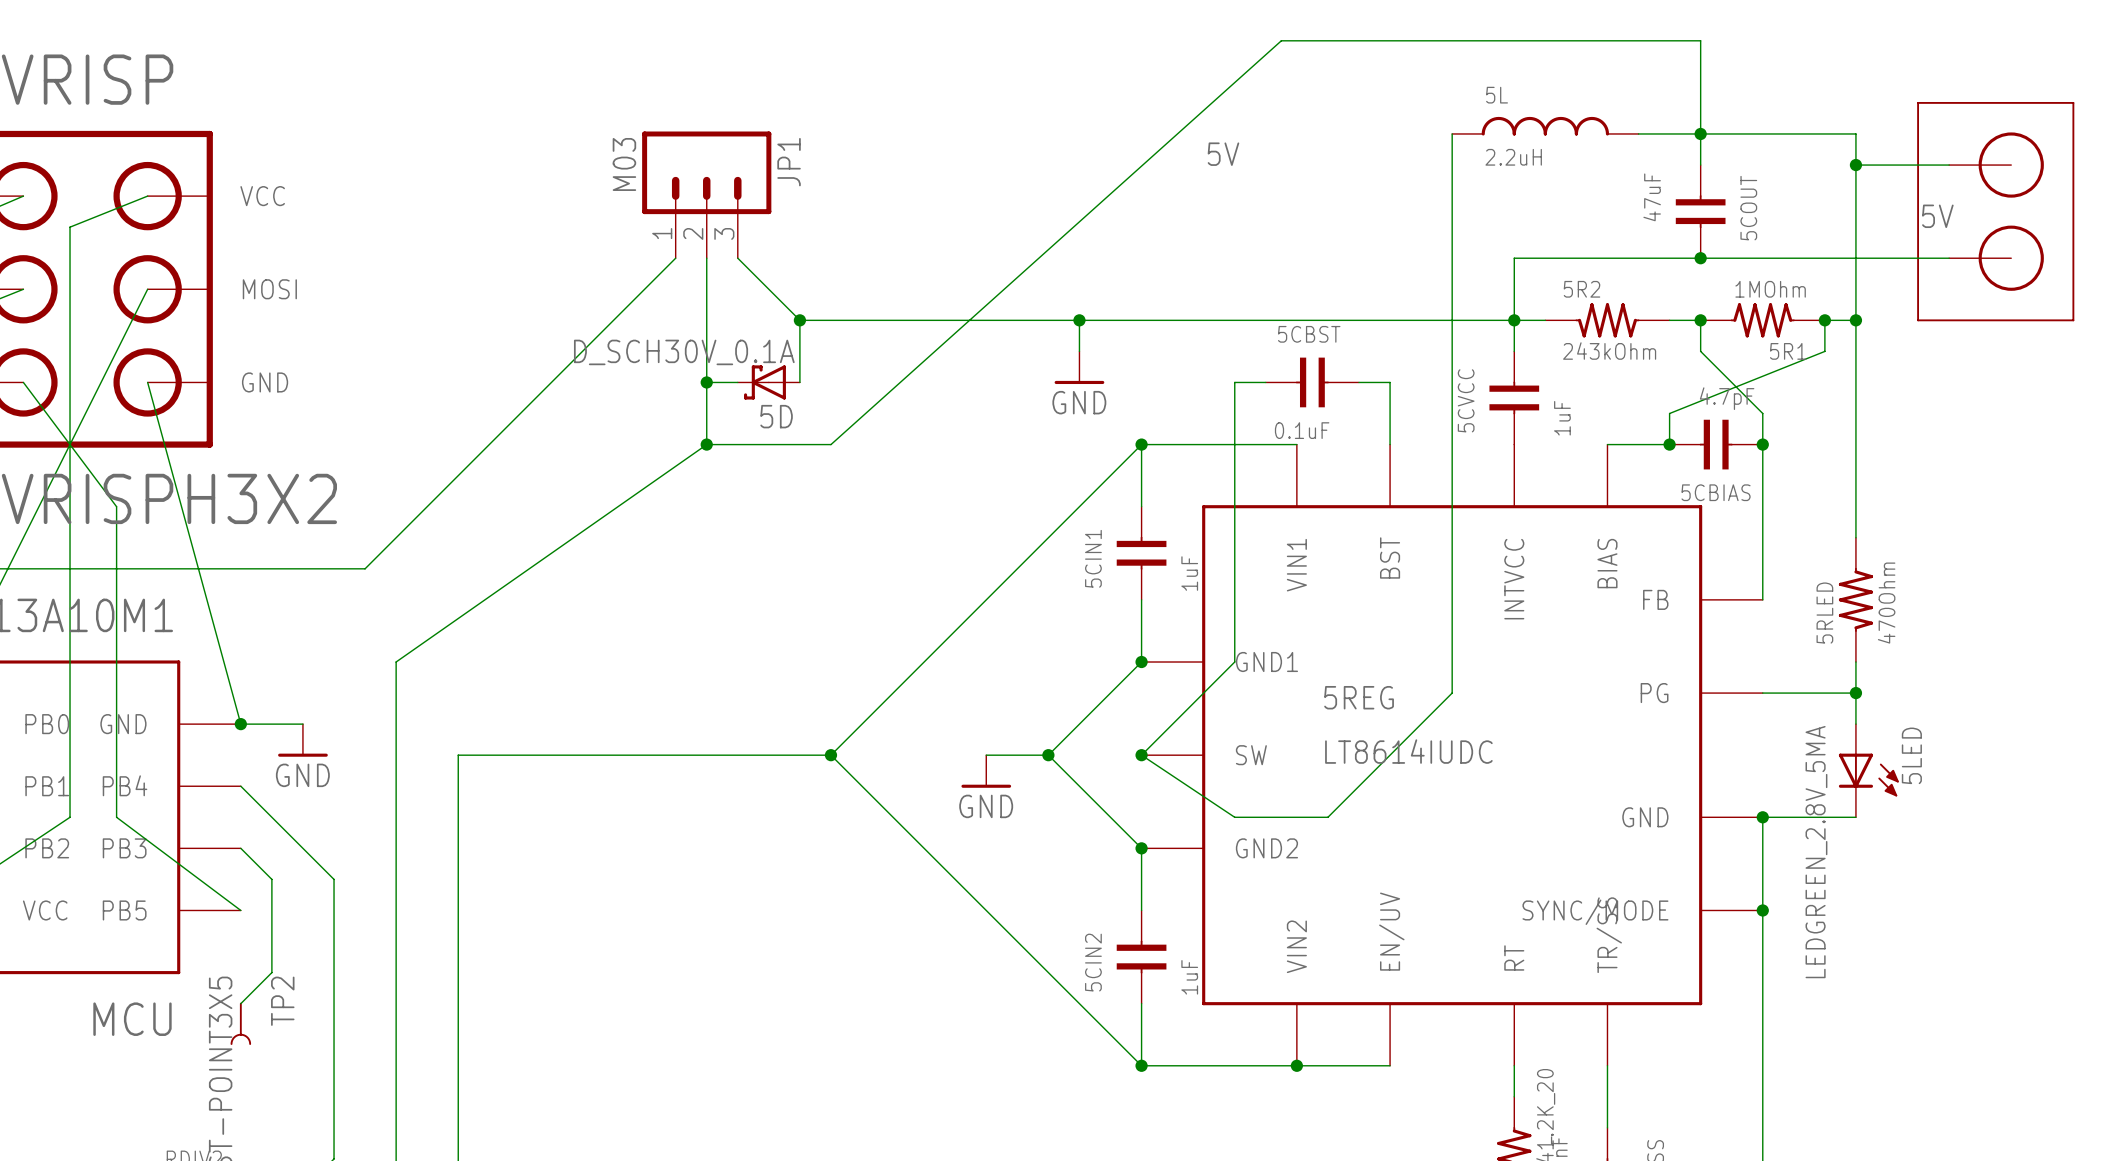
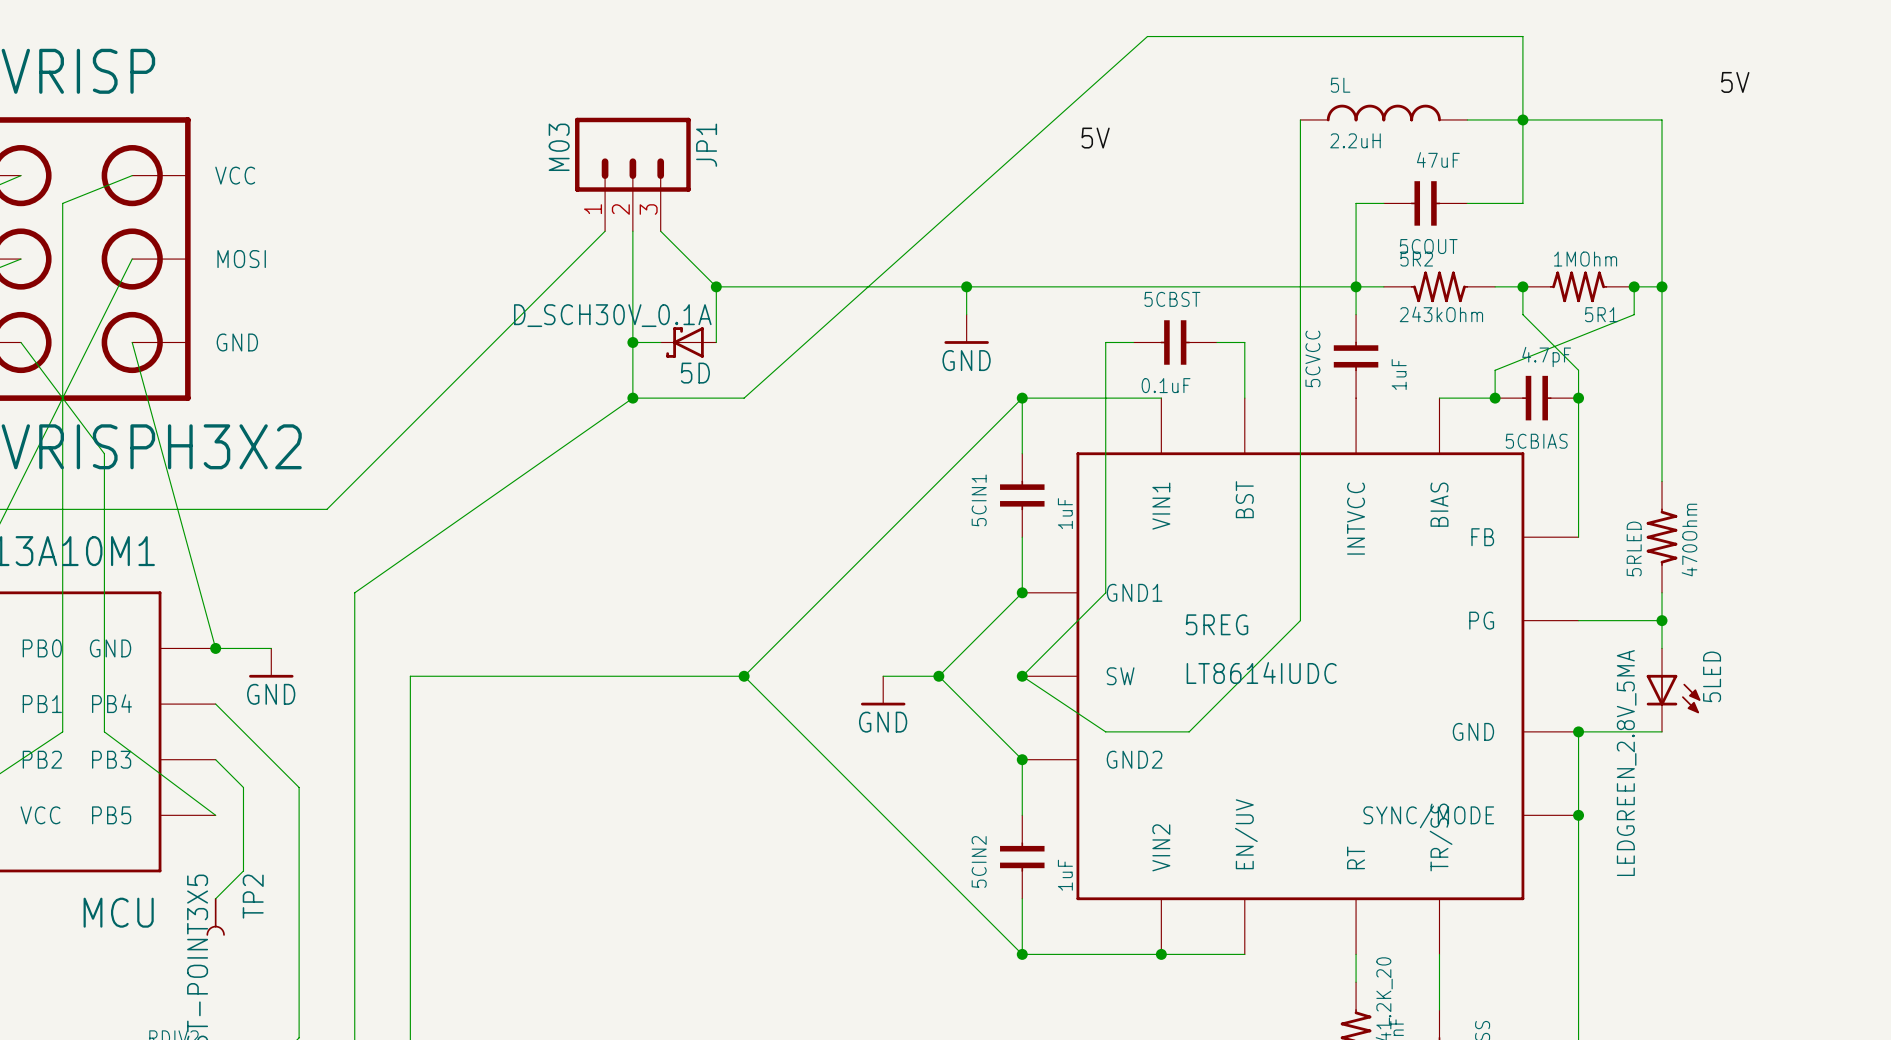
line: (1918, 102) (2073, 102) (2073, 320) (1918, 320) (1918, 102) -> none
wire: none -> (1522, 147) (1522, 203) (1467, 203)
wire: (1855, 165) (1949, 165) -> none
junction: (1855, 165) -> none
part: (1996, 165) -> none
5COUT rotation: 0° (1700, 211) -> 90° clockwise (1425, 203)
5COUT position: (1700, 211) -> (1425, 203)
label position: 5V (1937, 216) -> 5V (1735, 82)
wire: (1514, 258) (1949, 258) -> (1356, 231) (1356, 203) (1383, 203)
junction: (1700, 258) -> none
part: (1996, 258) -> none

